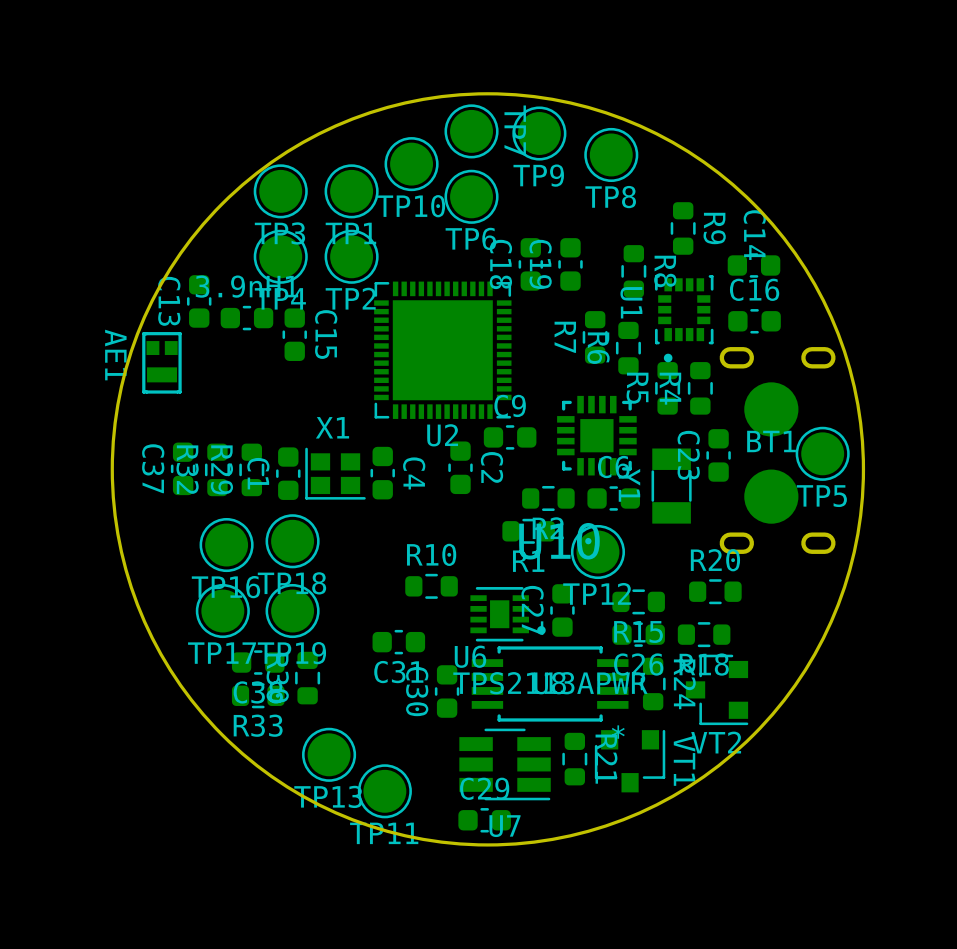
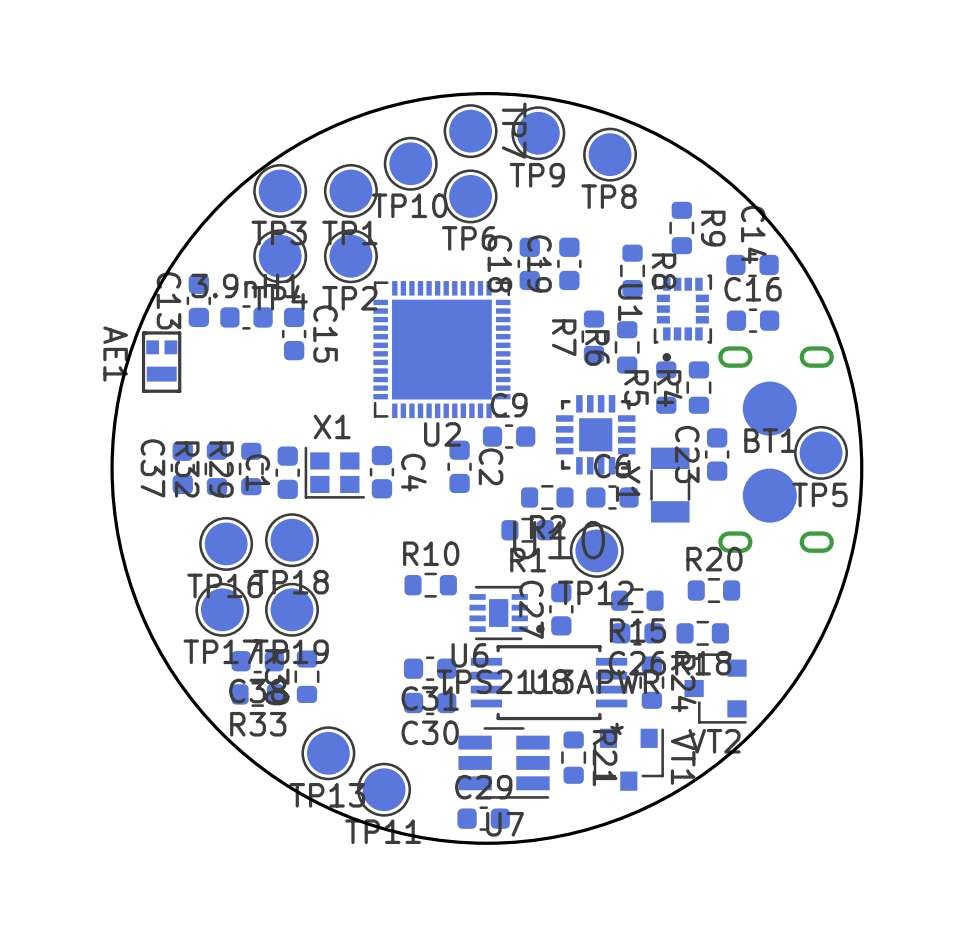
C31 position: (398, 642) -> (430, 668)
C30 name position: C30 (417, 691) -> C30 (430, 732)
C30 rotation: 0° (447, 691) -> 90° clockwise (430, 702)

